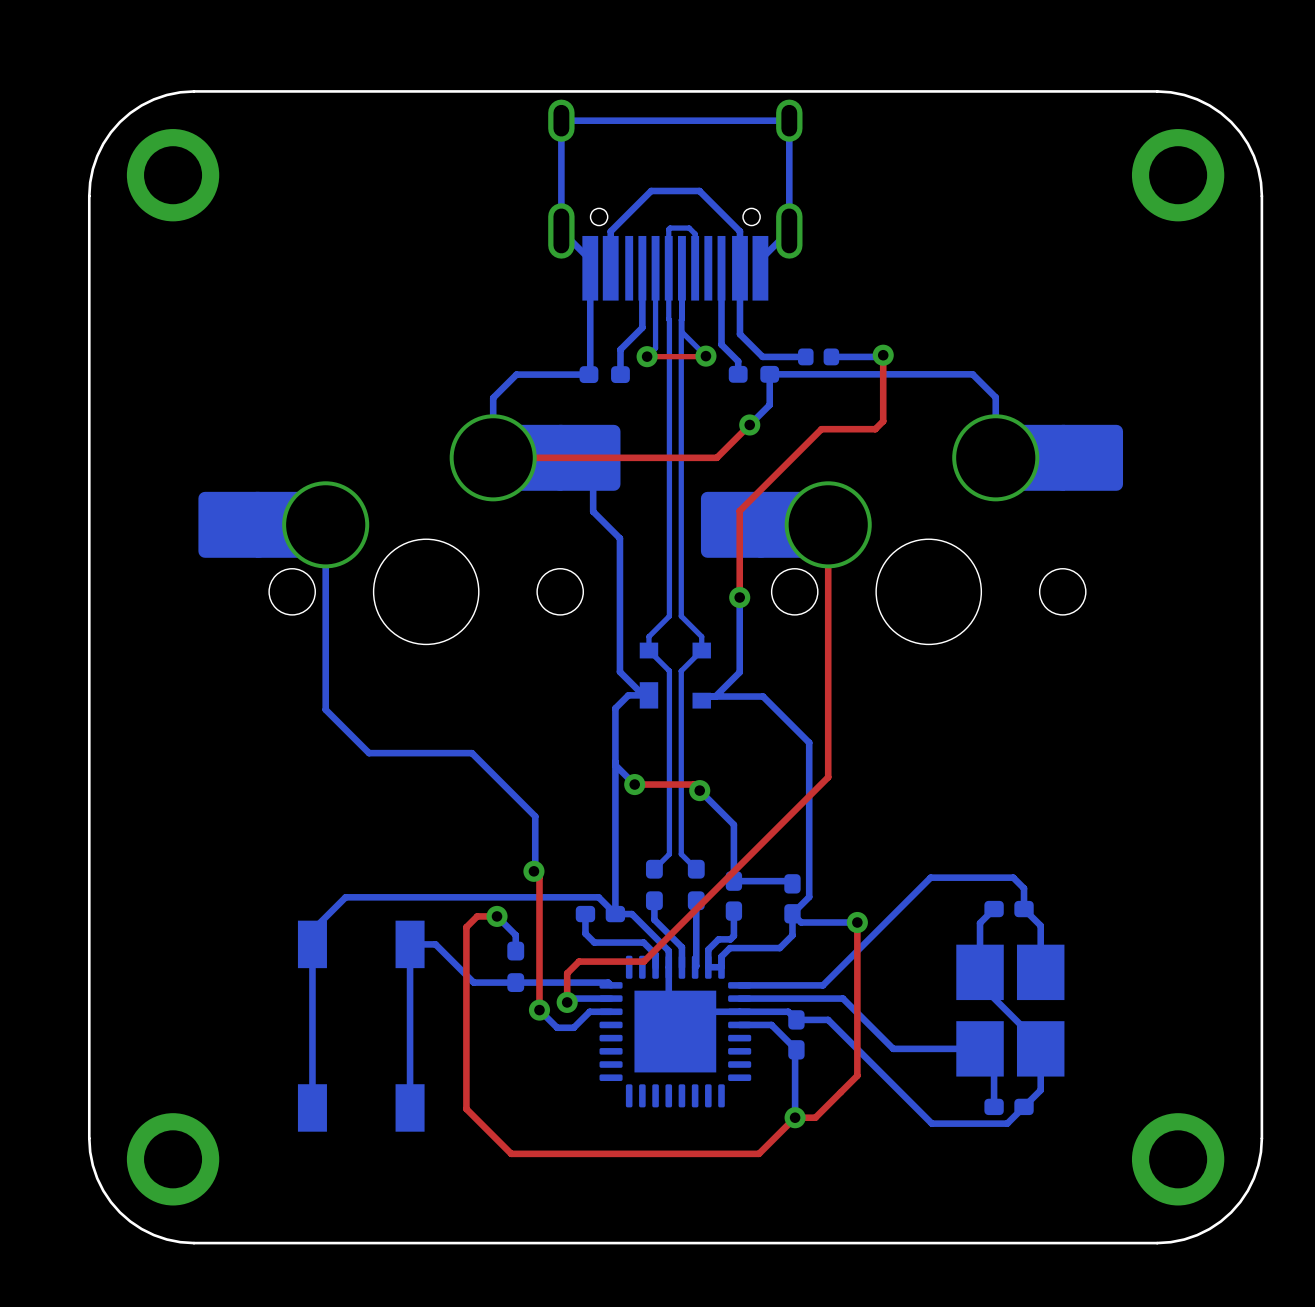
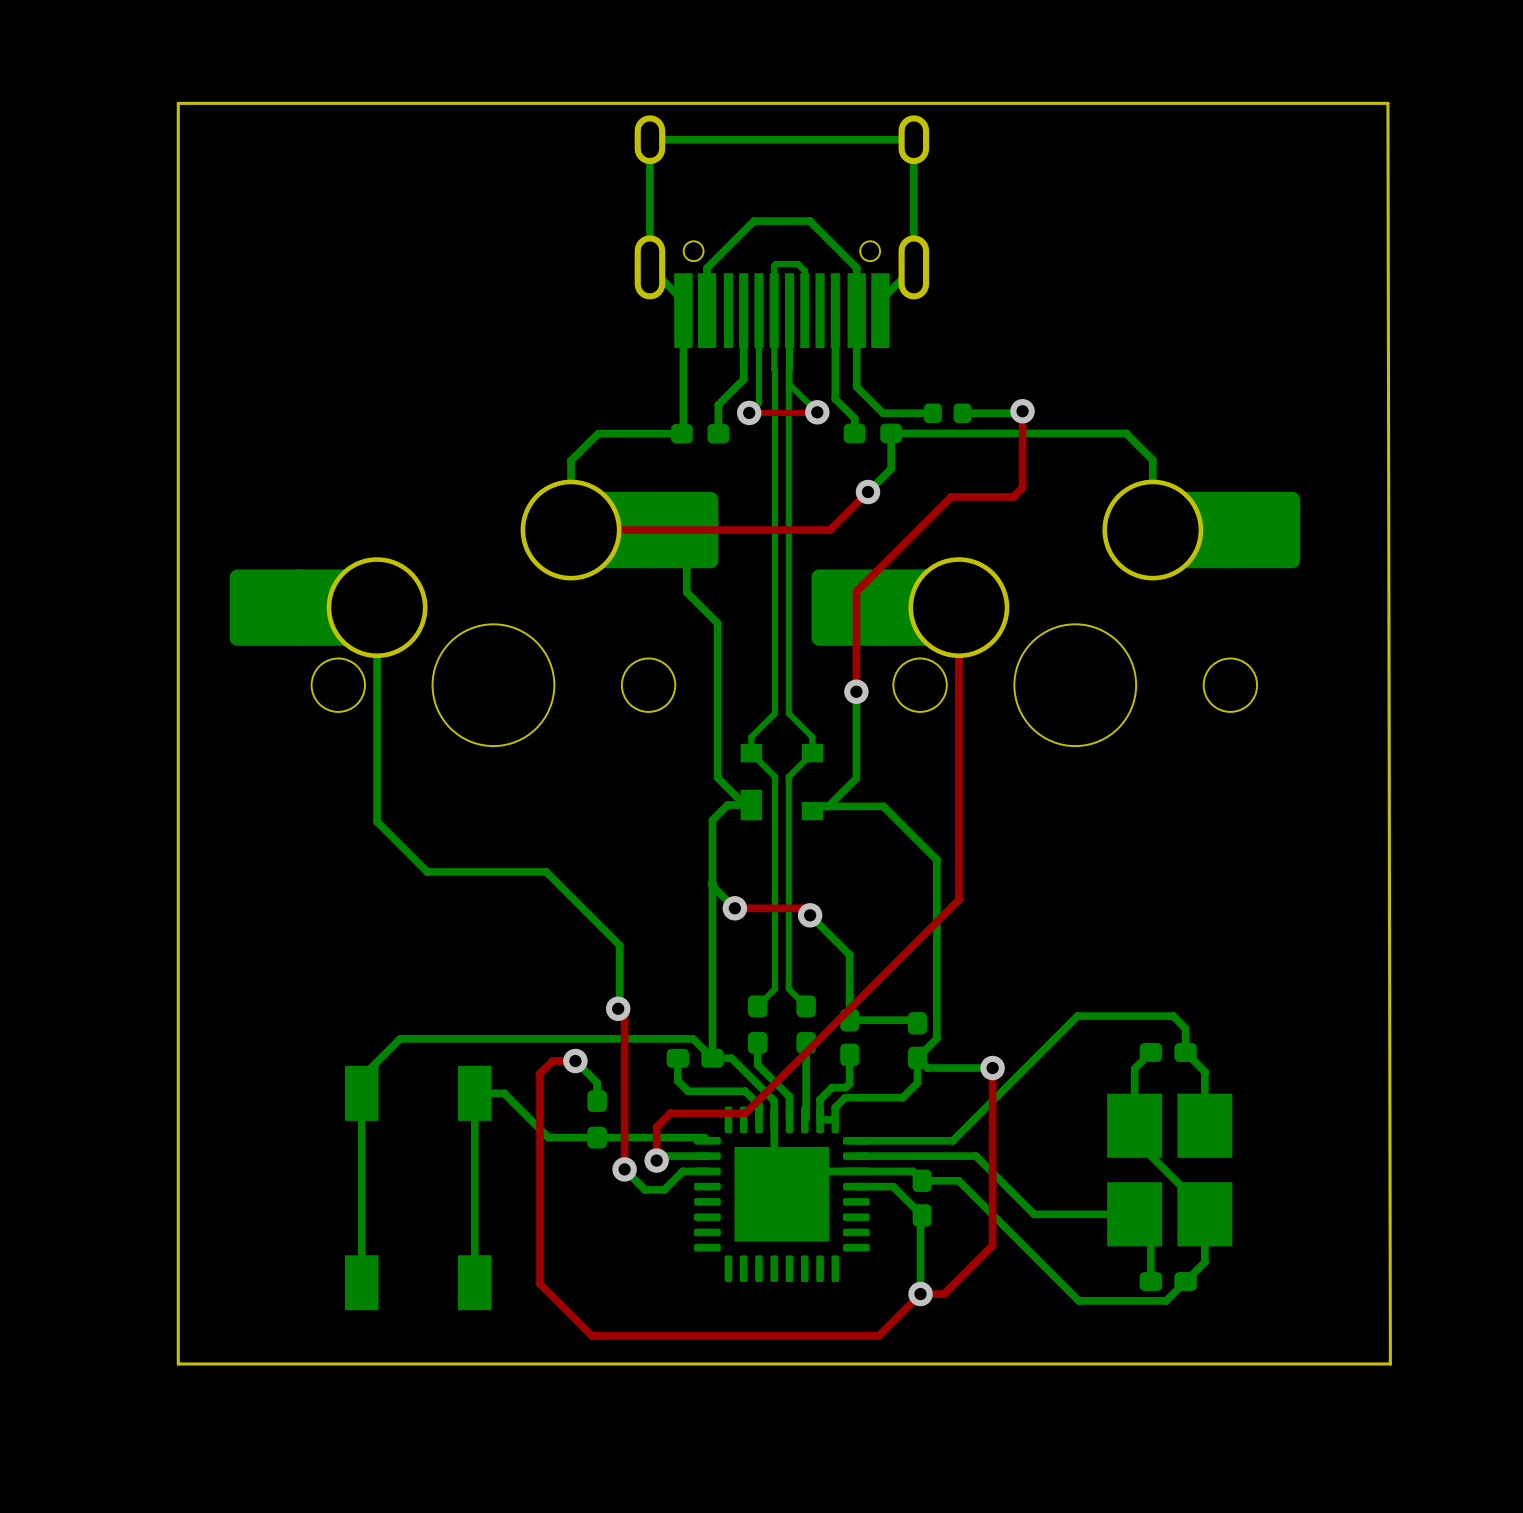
board edge: (193, 91) (1157, 91) (1184, 95) (1197, 99) (1209, 105) (1231, 122) (1247, 143) (1253, 156) (1258, 169) (1261, 196) (1261, 1138) (1258, 1165) (1253, 1178) (1240, 1202) (1231, 1212) (1209, 1229) (1197, 1235) (1170, 1242) (1157, 1243) (193, 1243) (180, 1242) (153, 1235) (130, 1221) (119, 1212) (110, 1202) (97, 1178) (92, 1165) (89, 1138) (90, 182) (92, 169) (103, 143) (119, 122) (130, 113) (153, 99) (166, 95) (193, 91) -> (178, 103) (178, 1363) (1390, 1363) (1387, 103) (178, 103)
part: (173, 175) -> none
part: (1178, 175) -> none
part: (173, 1159) -> none
part: (1178, 1159) -> none

